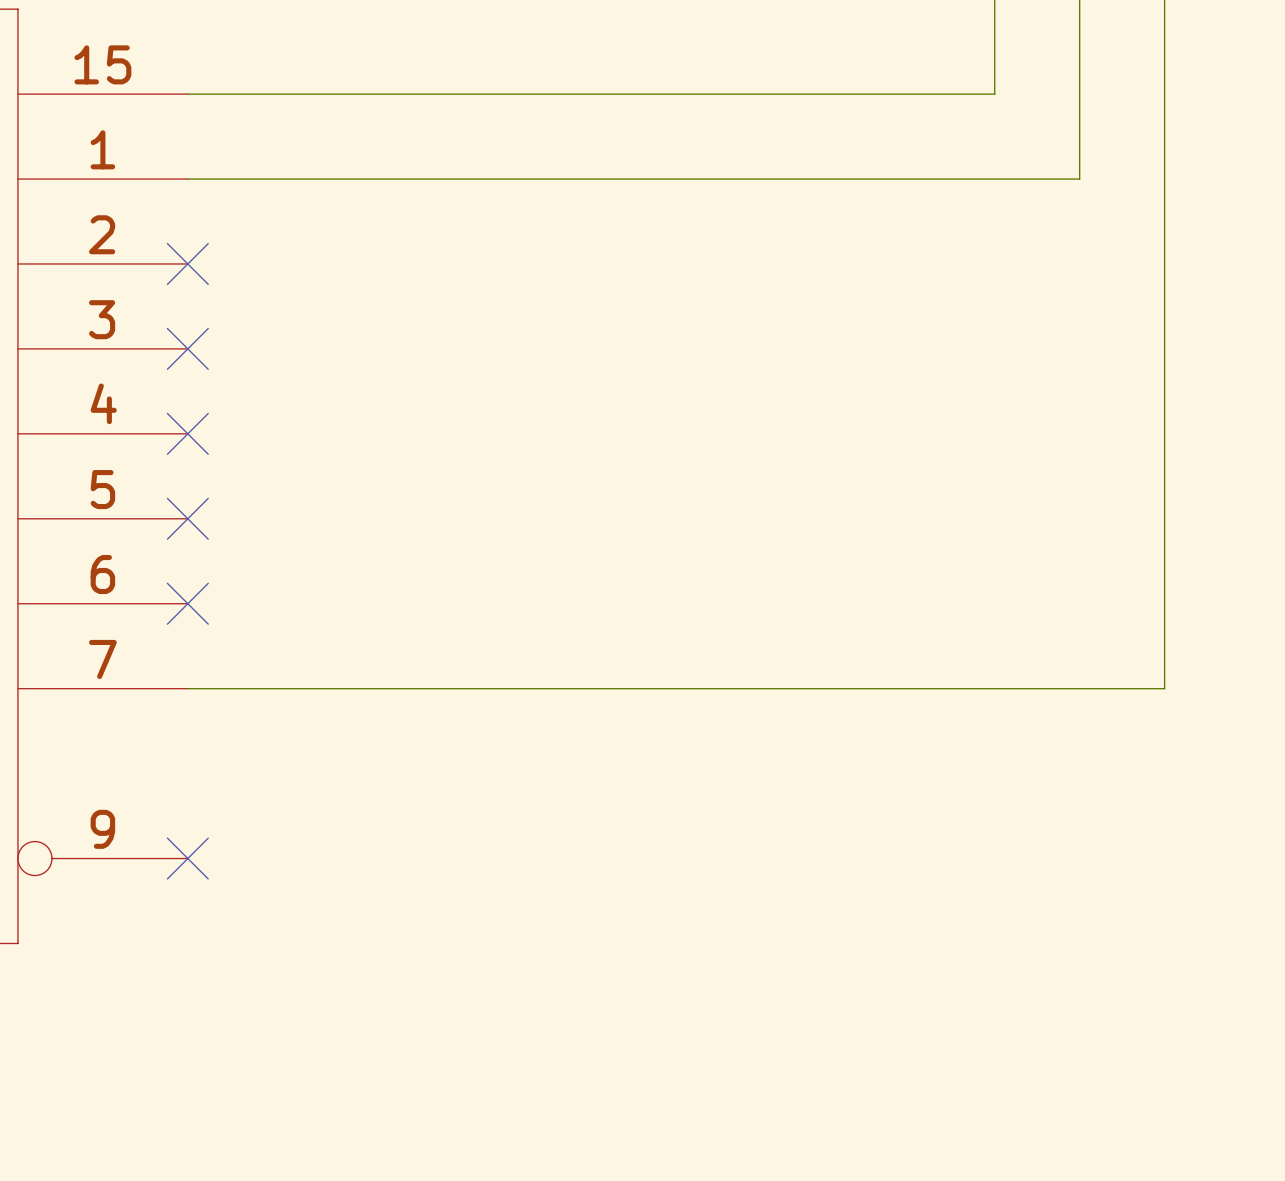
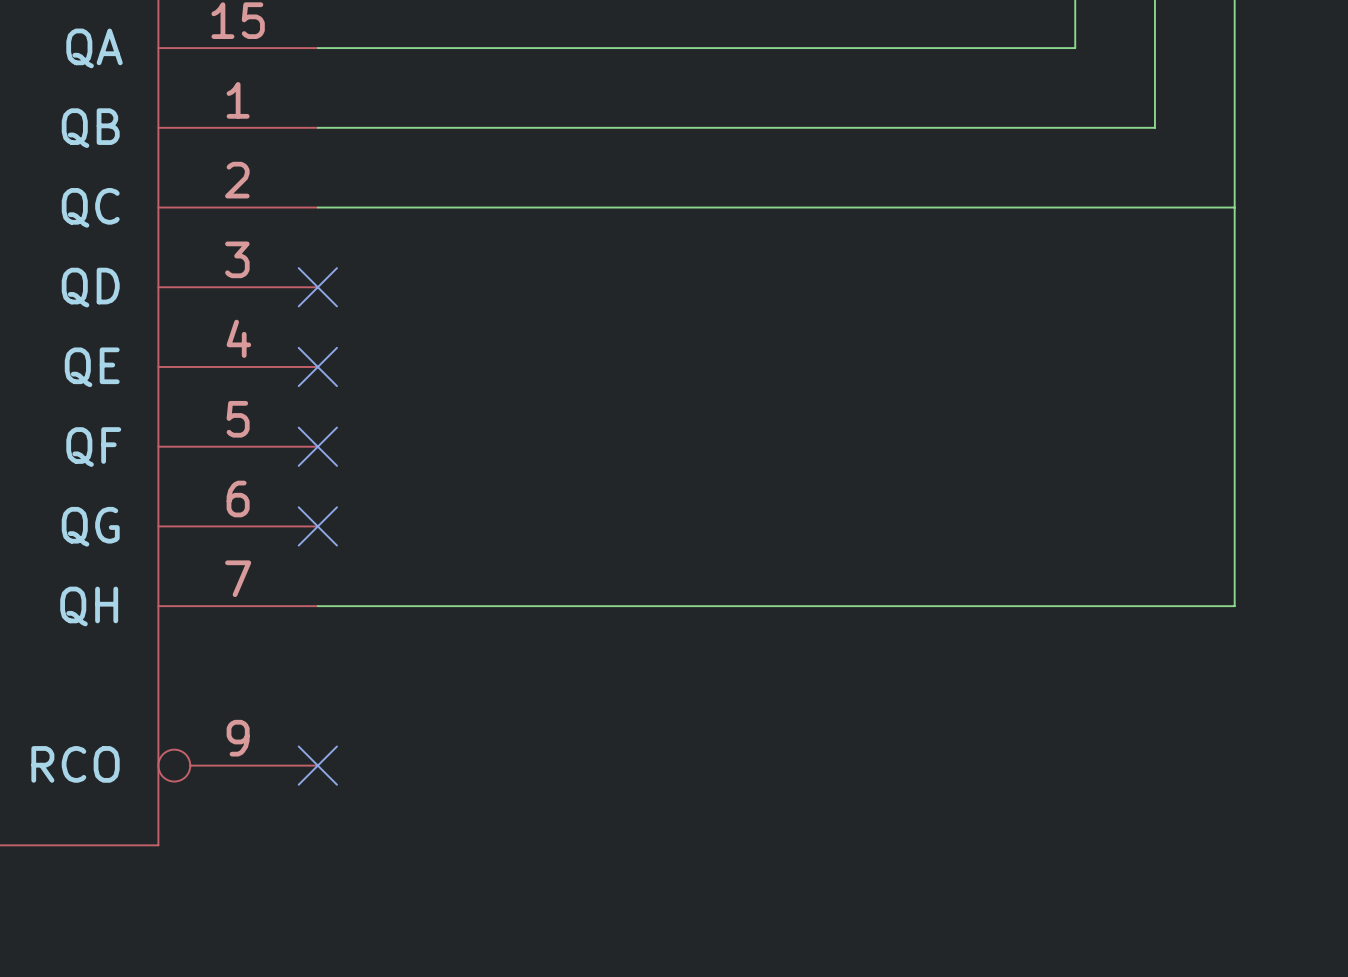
wire: none -> (317, 207) (1234, 207)
no-connect mark: (187, 263) -> none

